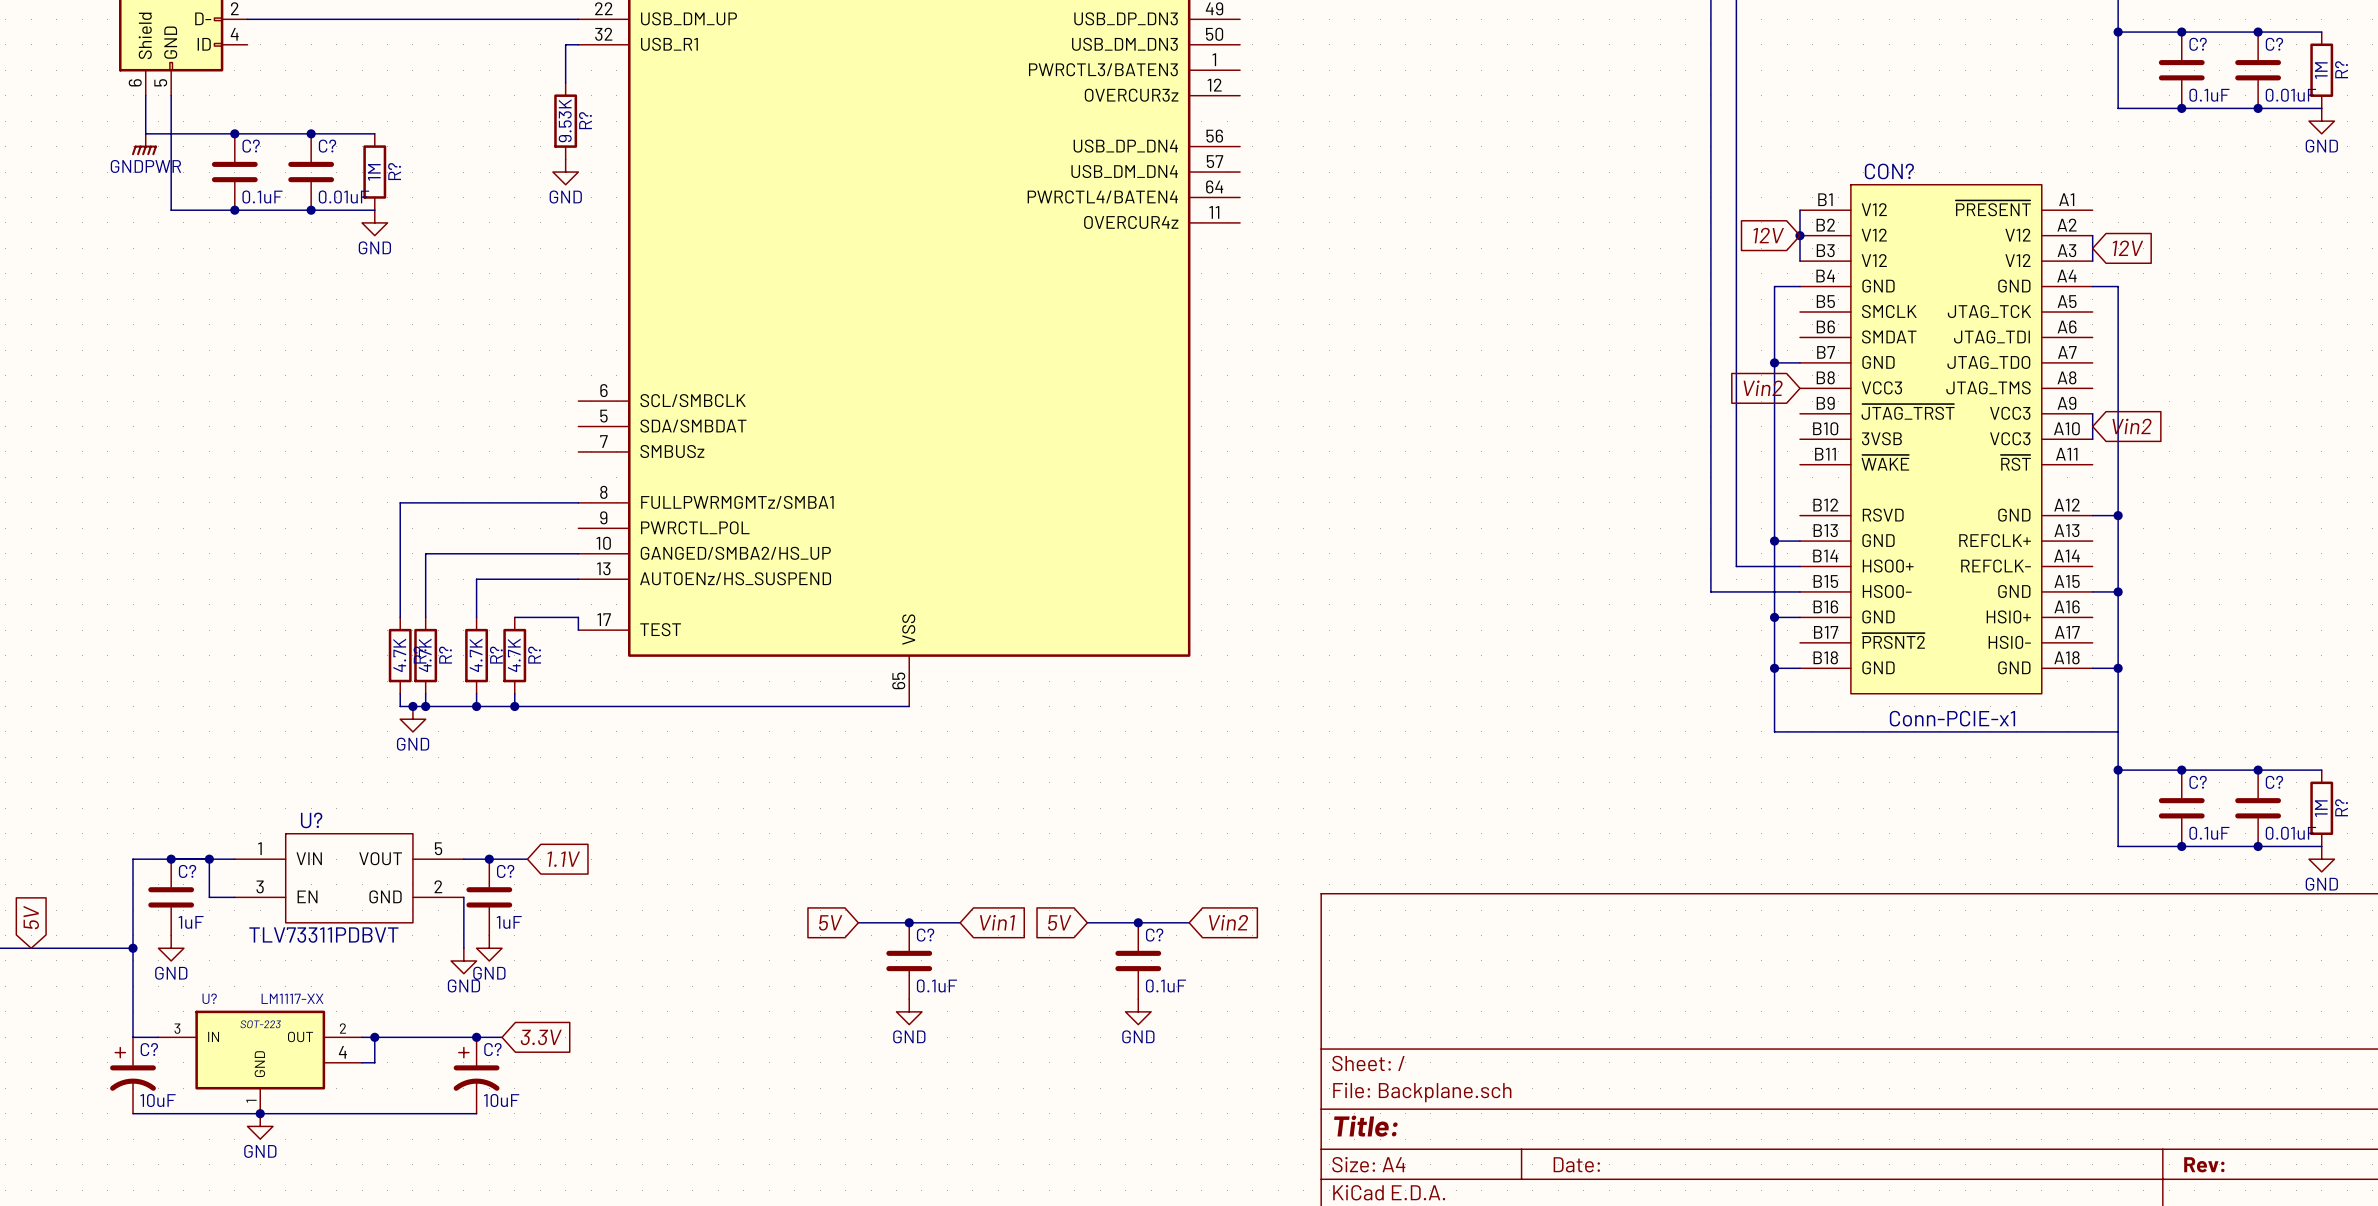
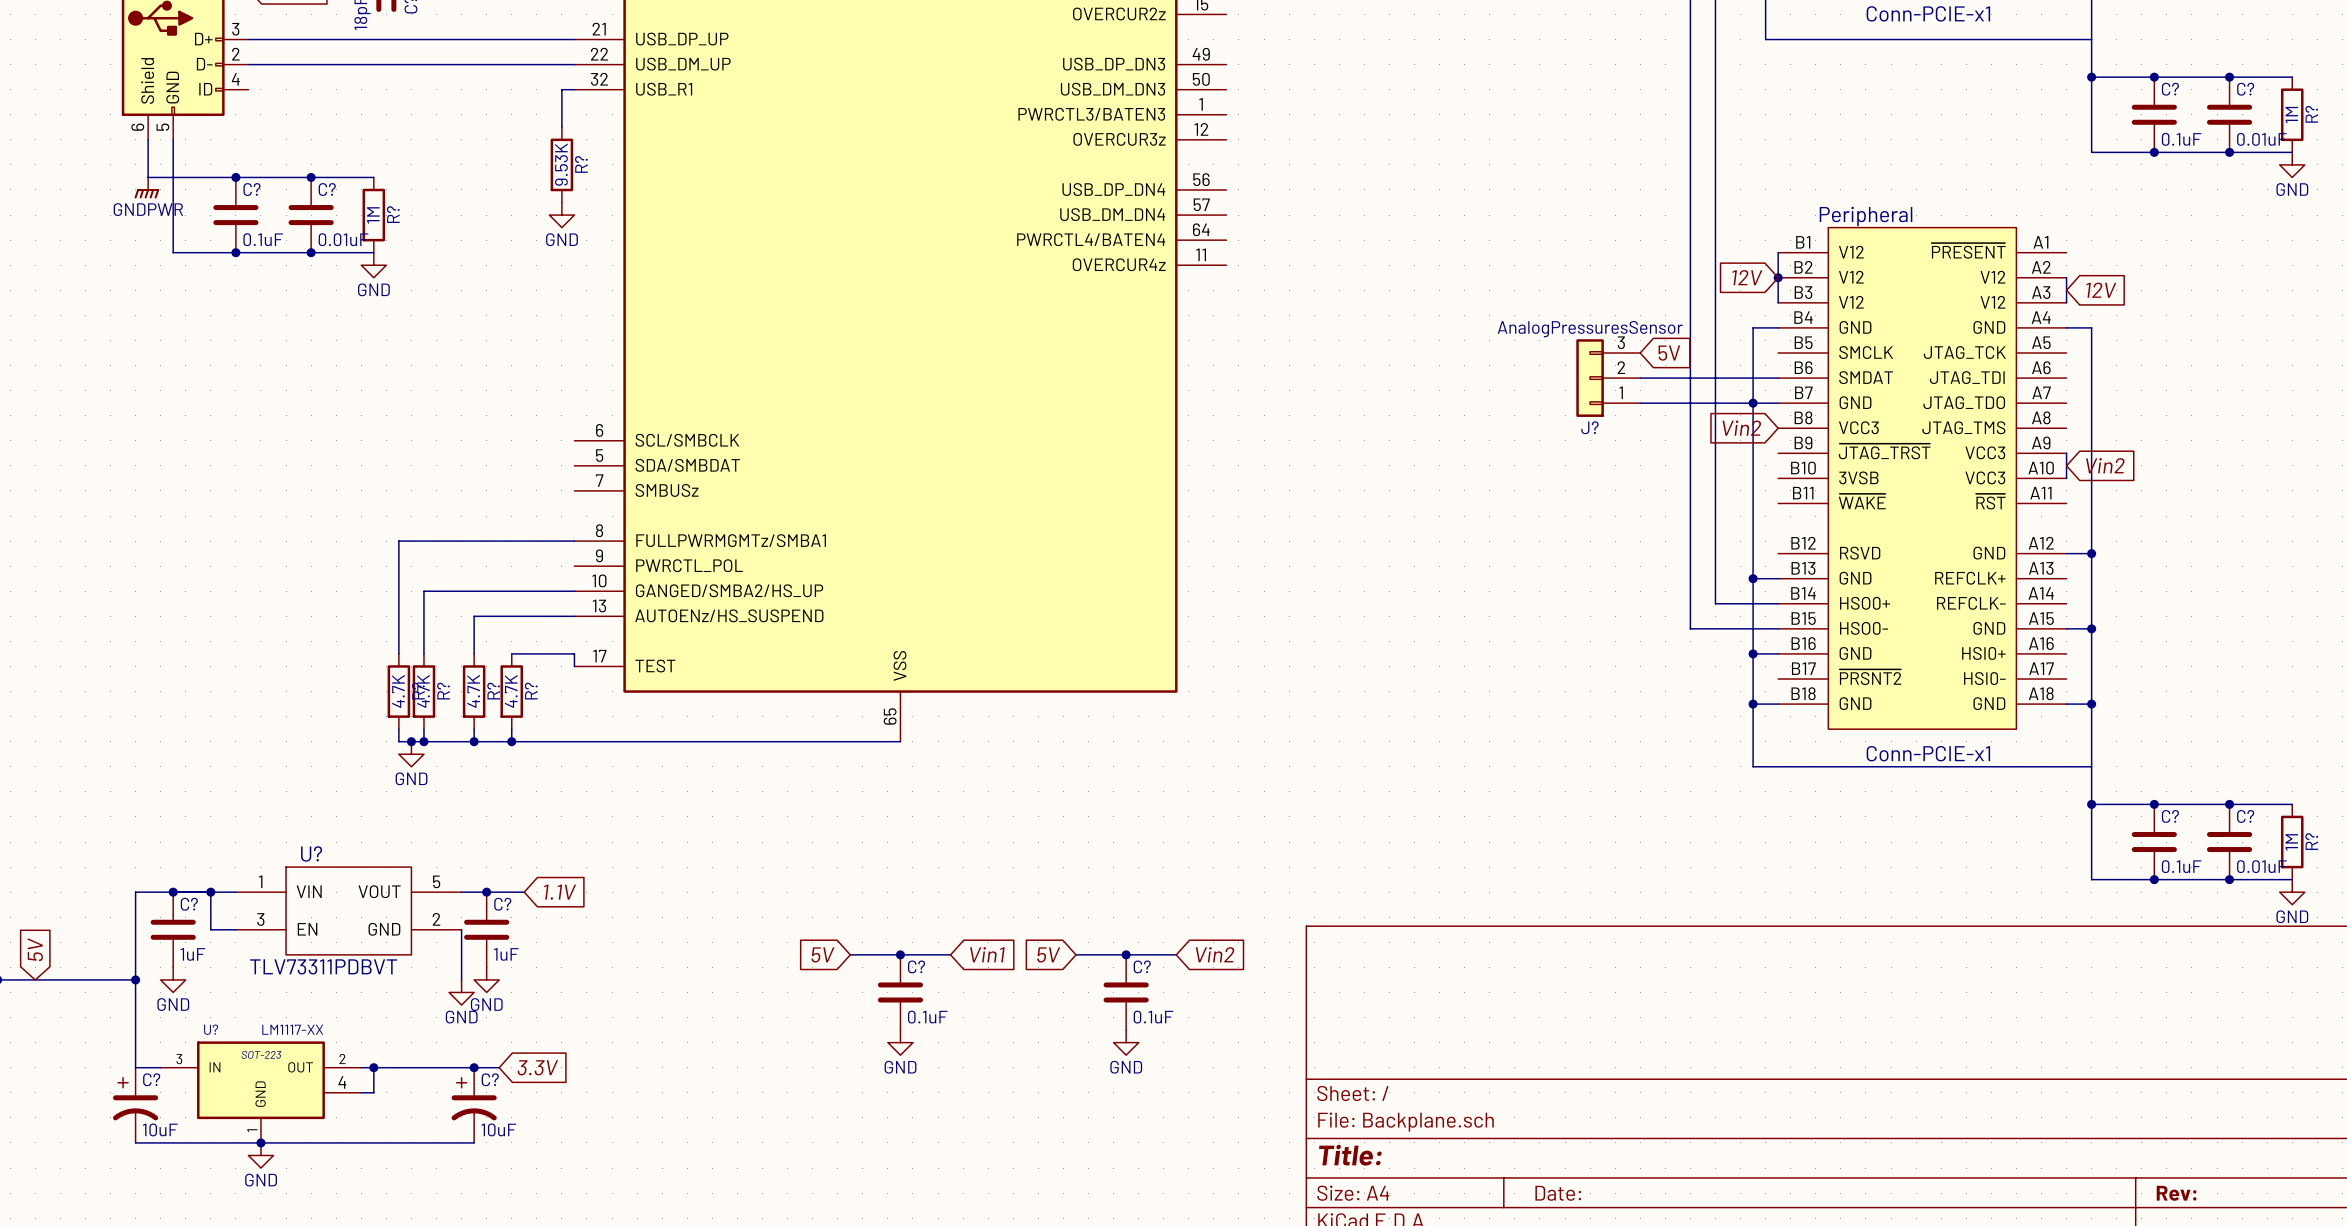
CON? name: CON? (1889, 171) -> Peripheral (1866, 216)
global label: none -> 5V (1669, 353)
J?: none -> AnalogPressuresSensor (1608, 378)
wire: none -> (1640, 378) (1778, 378)
wire: none -> (1640, 403) (1753, 403)

